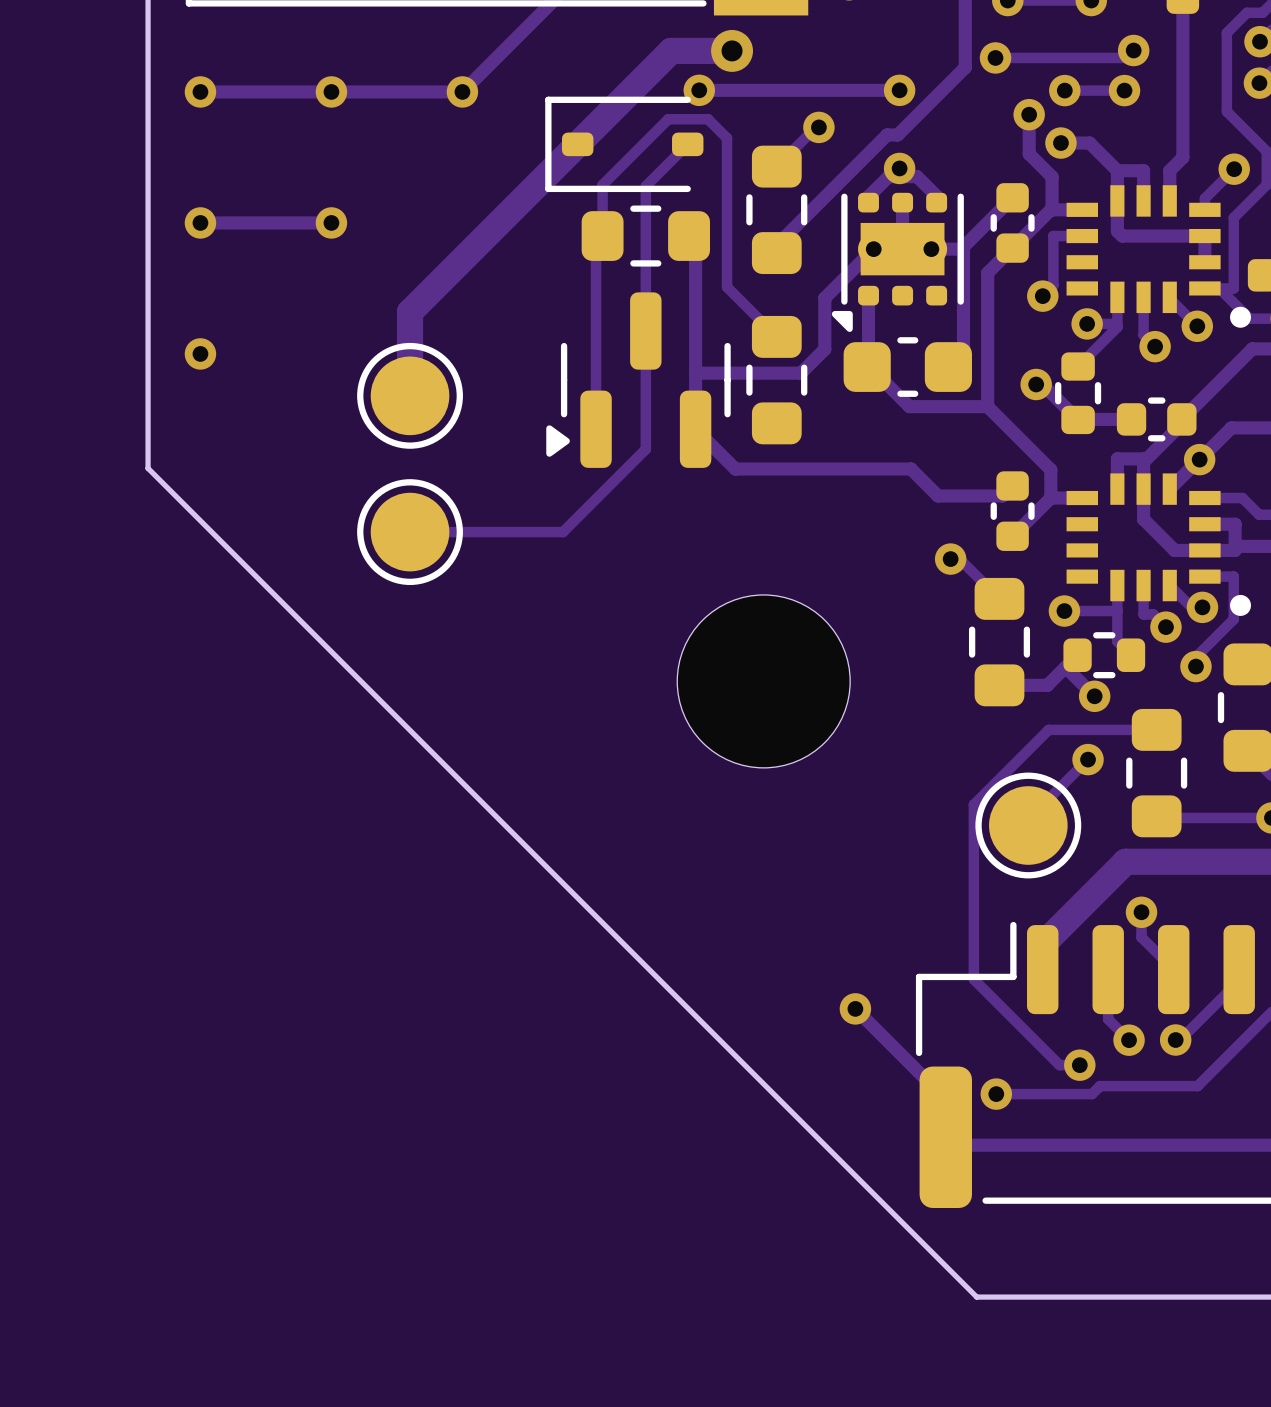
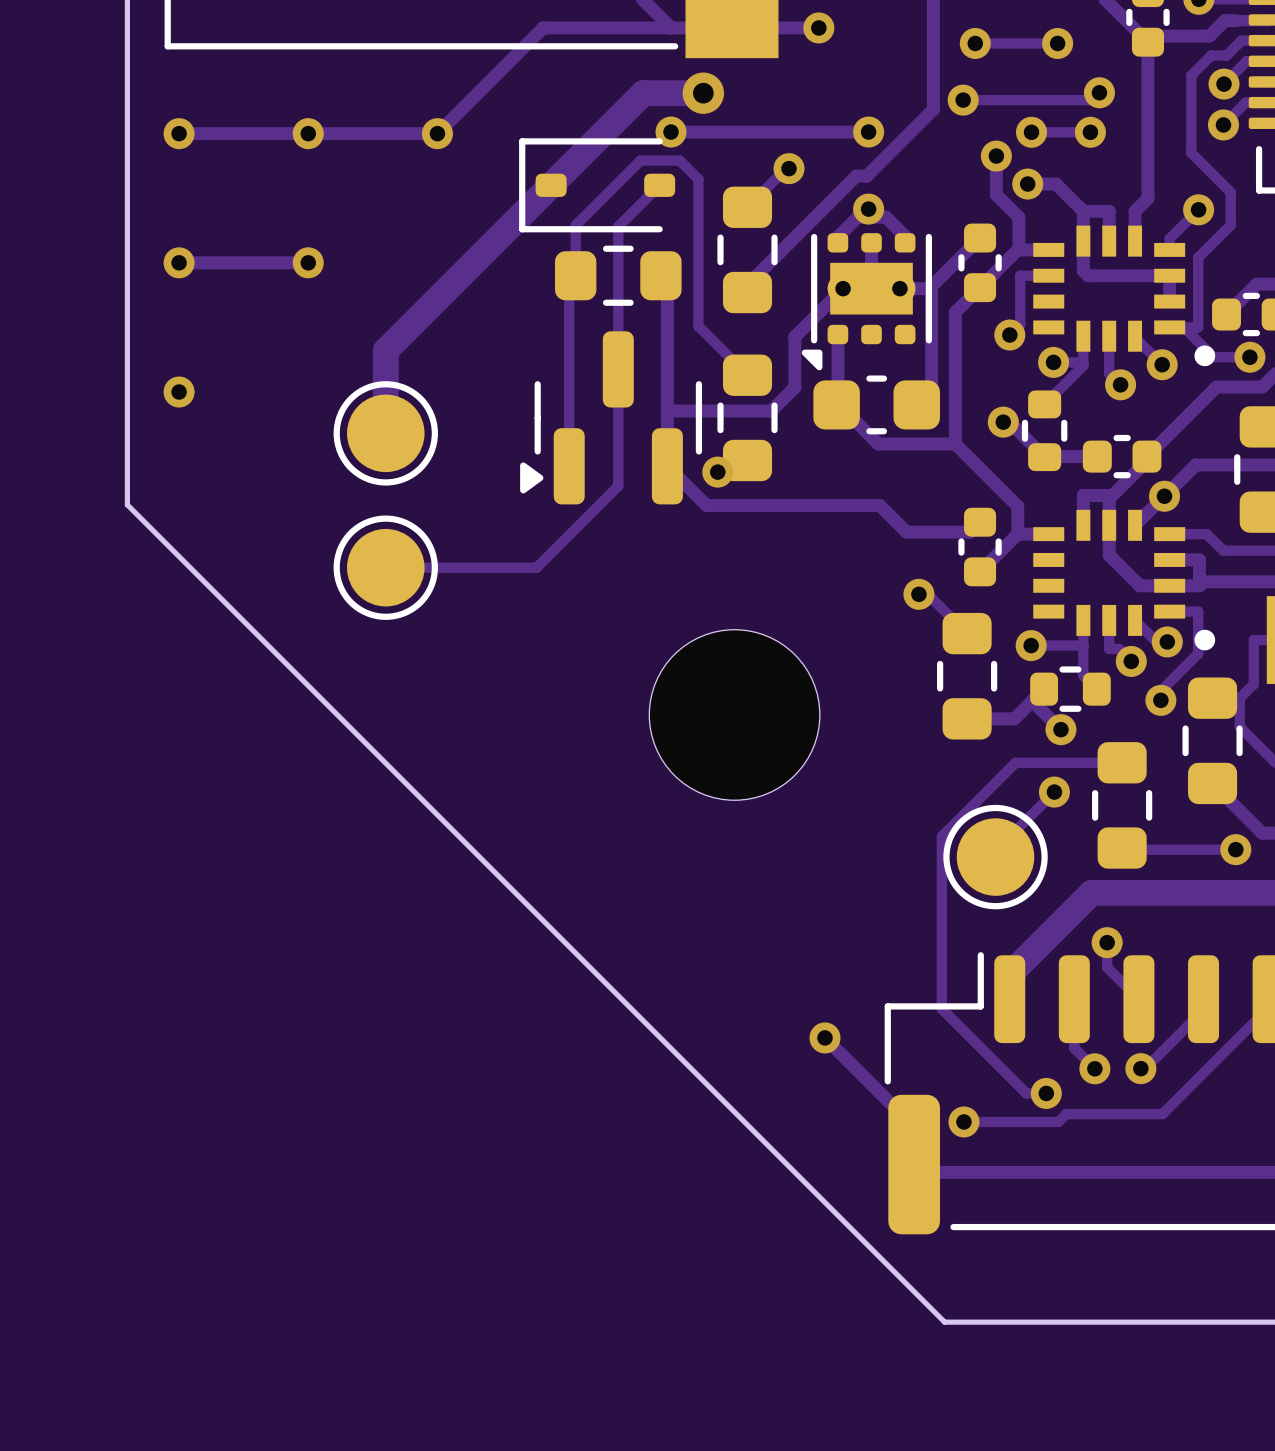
via: none -> (717, 472)

